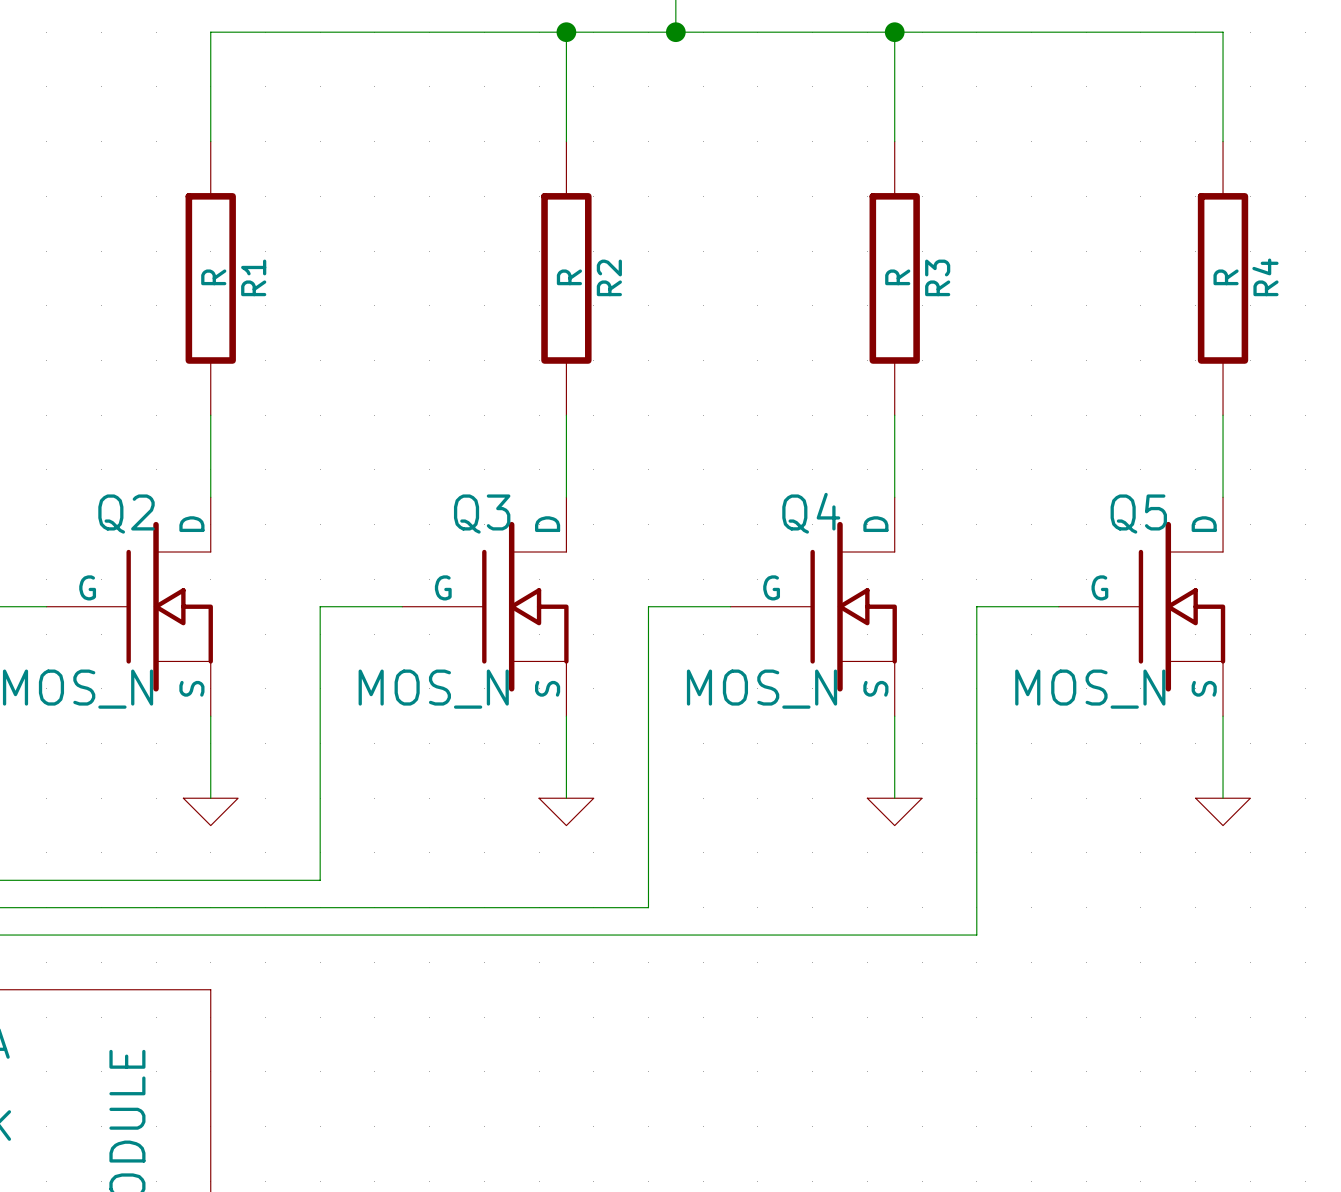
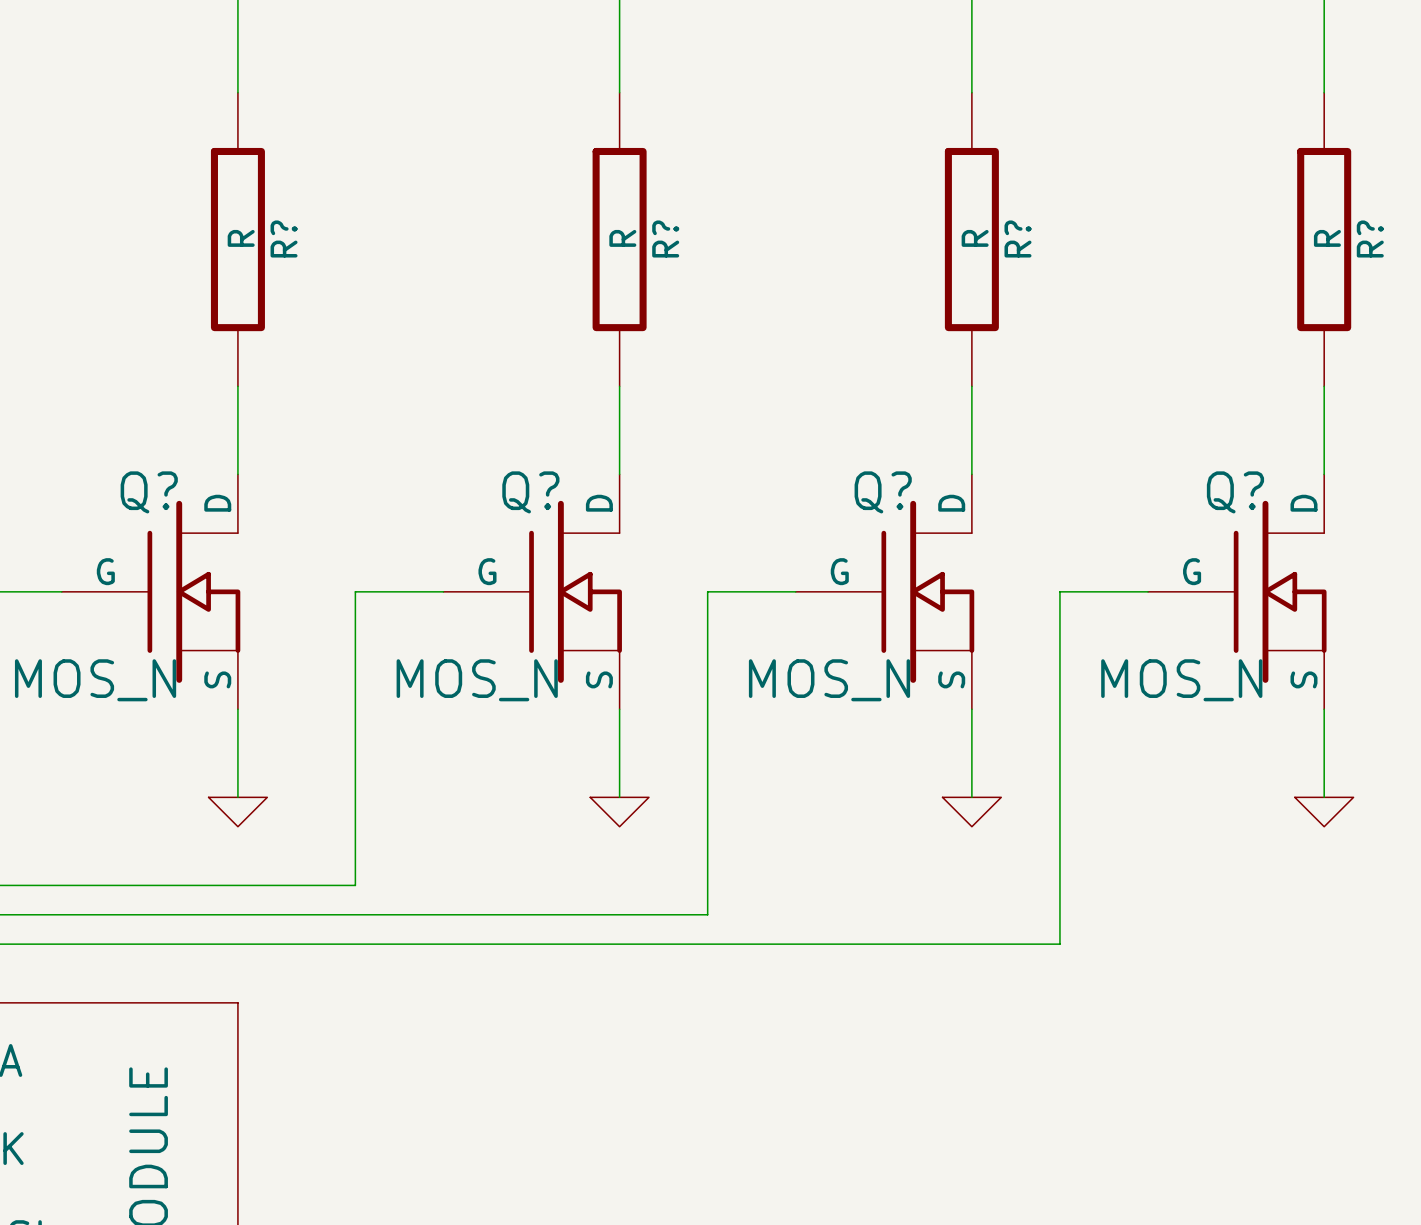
R1 name: R1 (253, 277) -> R? (284, 238)
R2 name: R2 (609, 277) -> R? (665, 238)
R3 name: R3 (937, 277) -> R? (1017, 238)
R4 name: R4 (1265, 277) -> R? (1370, 238)
Q4 name: Q4 (811, 513) -> Q? (883, 492)
Q2 name: Q2 (126, 514) -> Q? (149, 492)
Q3 name: Q3 (482, 514) -> Q? (530, 492)
Q5 name: Q5 (1138, 514) -> Q? (1235, 492)

